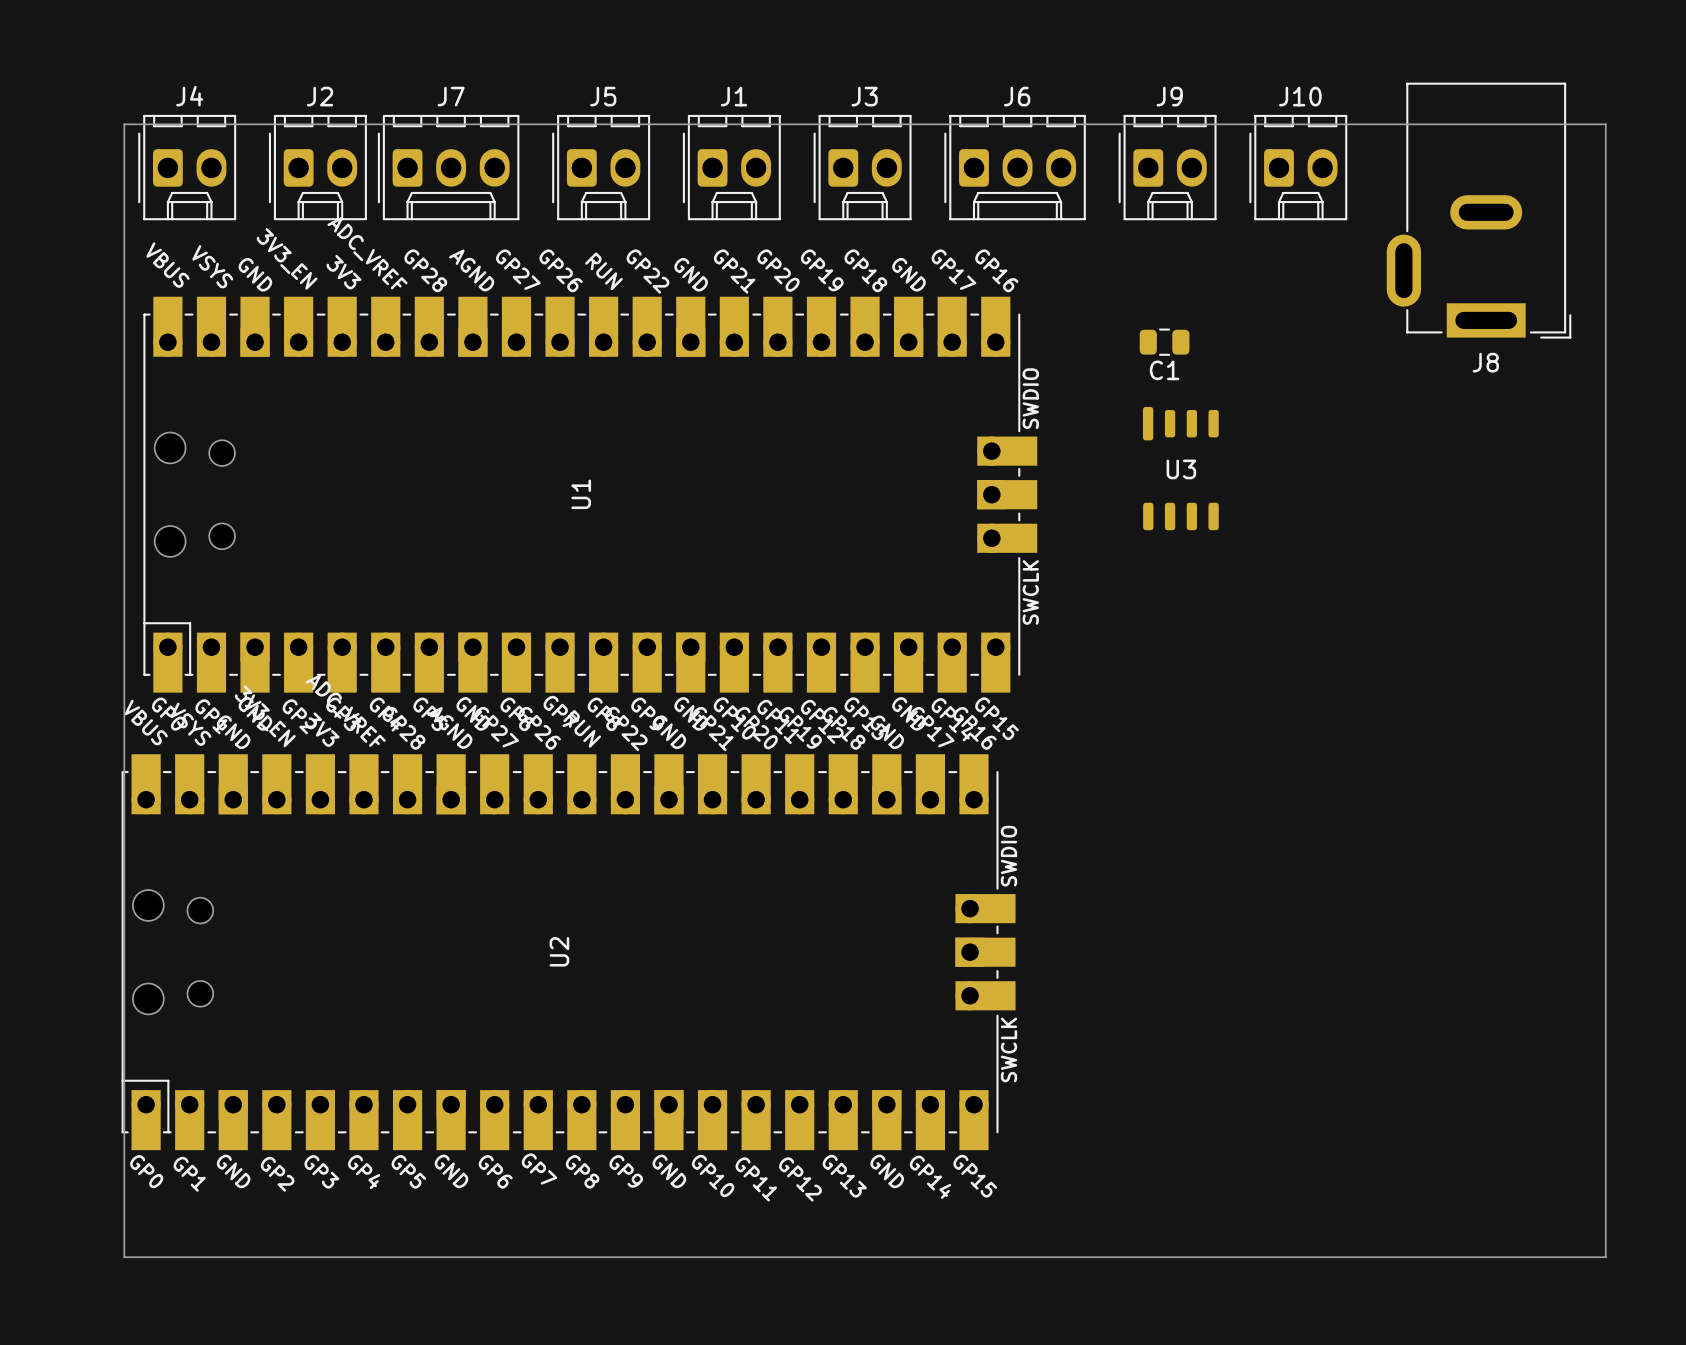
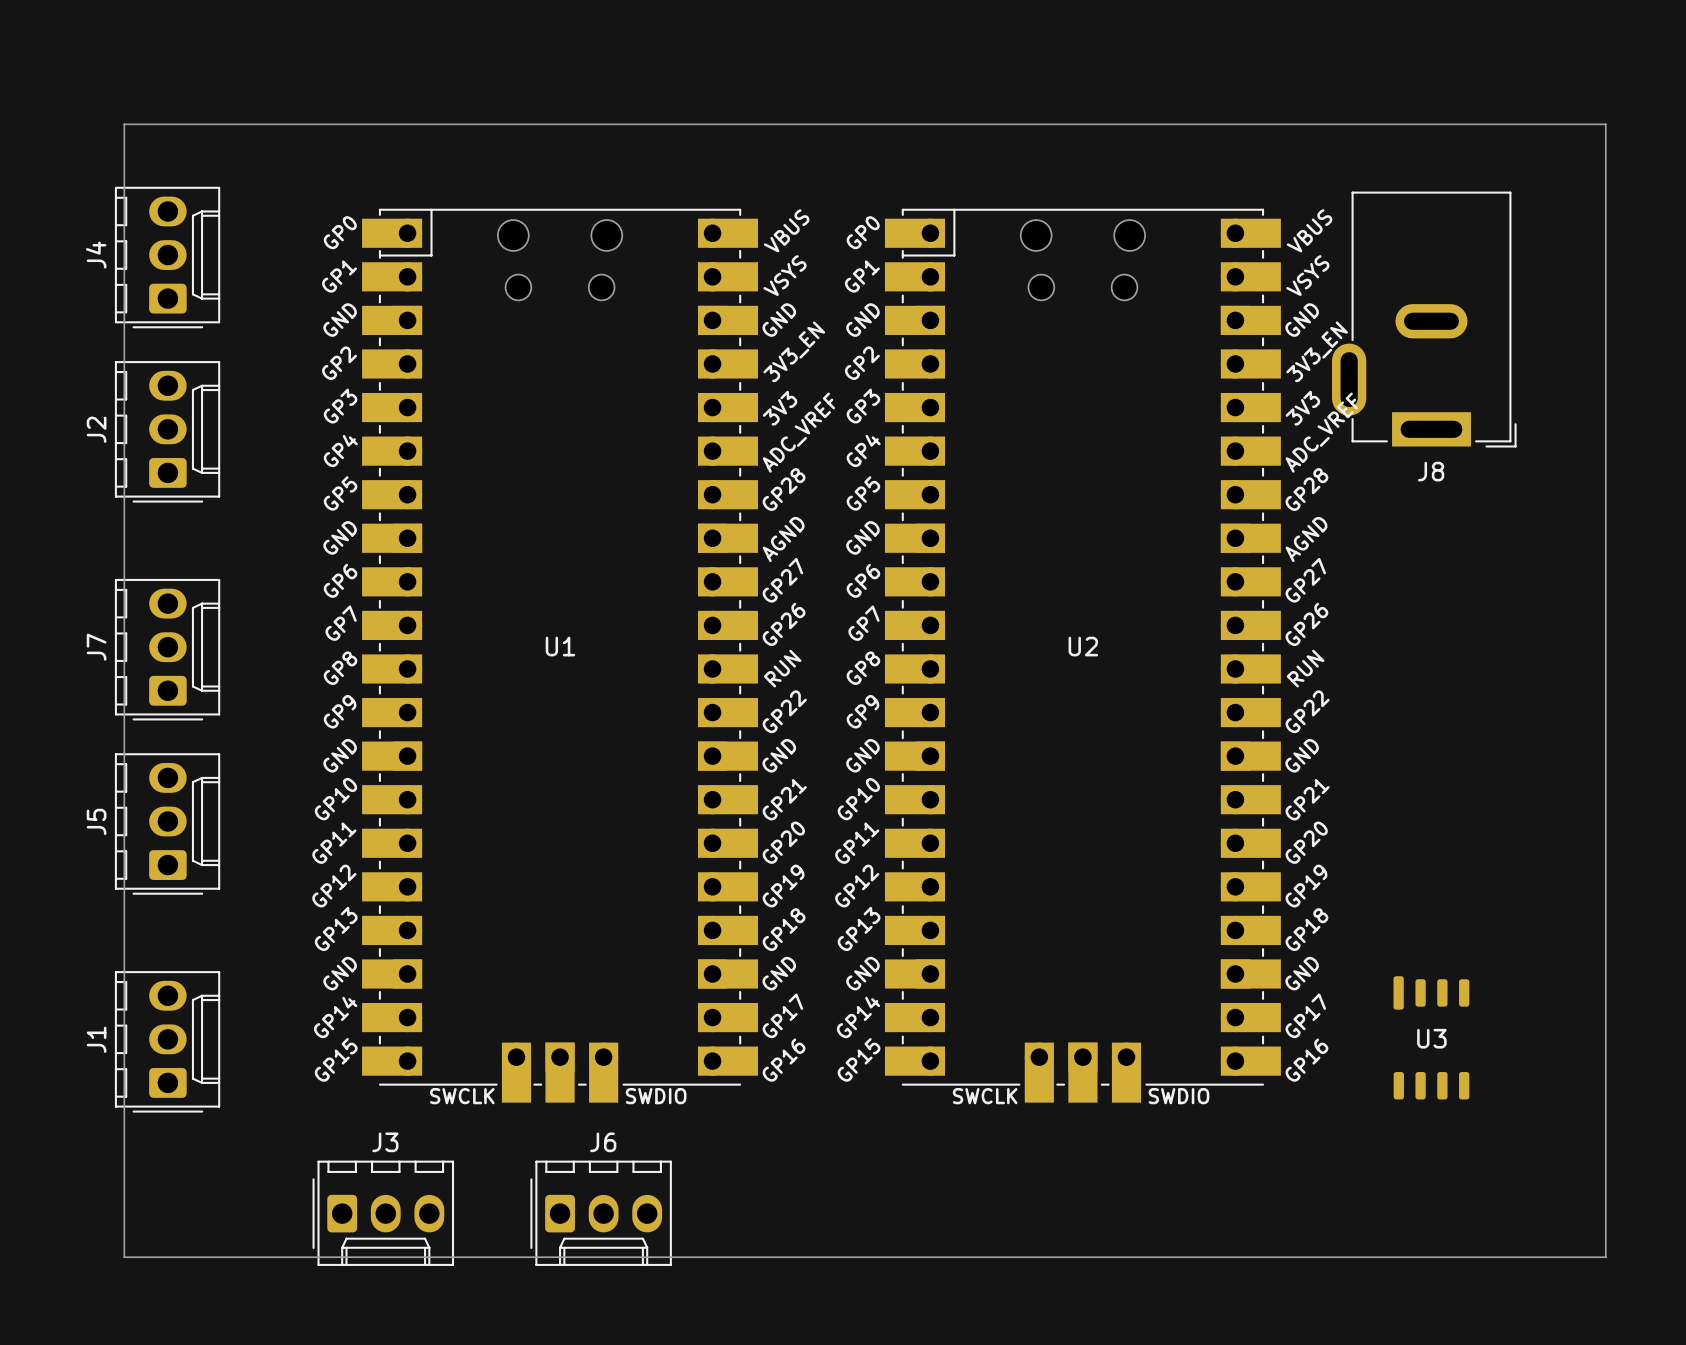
J4 name position: J4 (189, 96) -> J4 (96, 255)
J2 name position: J2 (320, 96) -> J2 (96, 429)
J5 name position: J5 (603, 96) -> J5 (96, 821)
J1 name position: J1 (733, 96) -> J1 (96, 1039)
J4 footprint: [138, 114, 237, 221] -> [114, 186, 221, 329]
J2 footprint: [268, 114, 367, 221] -> [114, 361, 221, 503]
J5 footprint: [552, 114, 651, 221] -> [114, 753, 221, 895]
J1 footprint: [682, 114, 781, 221] -> [114, 971, 221, 1113]
J3 footprint: [813, 114, 912, 221] -> [312, 1160, 455, 1266]
J7 rotation: 0° (448, 167) -> 90° counterclockwise (167, 649)
J7 position: (448, 167) -> (167, 649)
J6 position: (1015, 167) -> (601, 1213)
J9: (1167, 167) -> none
J10: (1298, 167) -> none
J8 position: (1479, 210) -> (1424, 319)
C1: (1164, 342) -> none
U3 position: (1180, 468) -> (1431, 1037)
U1 rotation: 0° (590, 494) -> 90° clockwise (560, 655)
U2 rotation: 0° (568, 952) -> 90° clockwise (1082, 655)
U2 position: (568, 952) -> (1082, 655)

